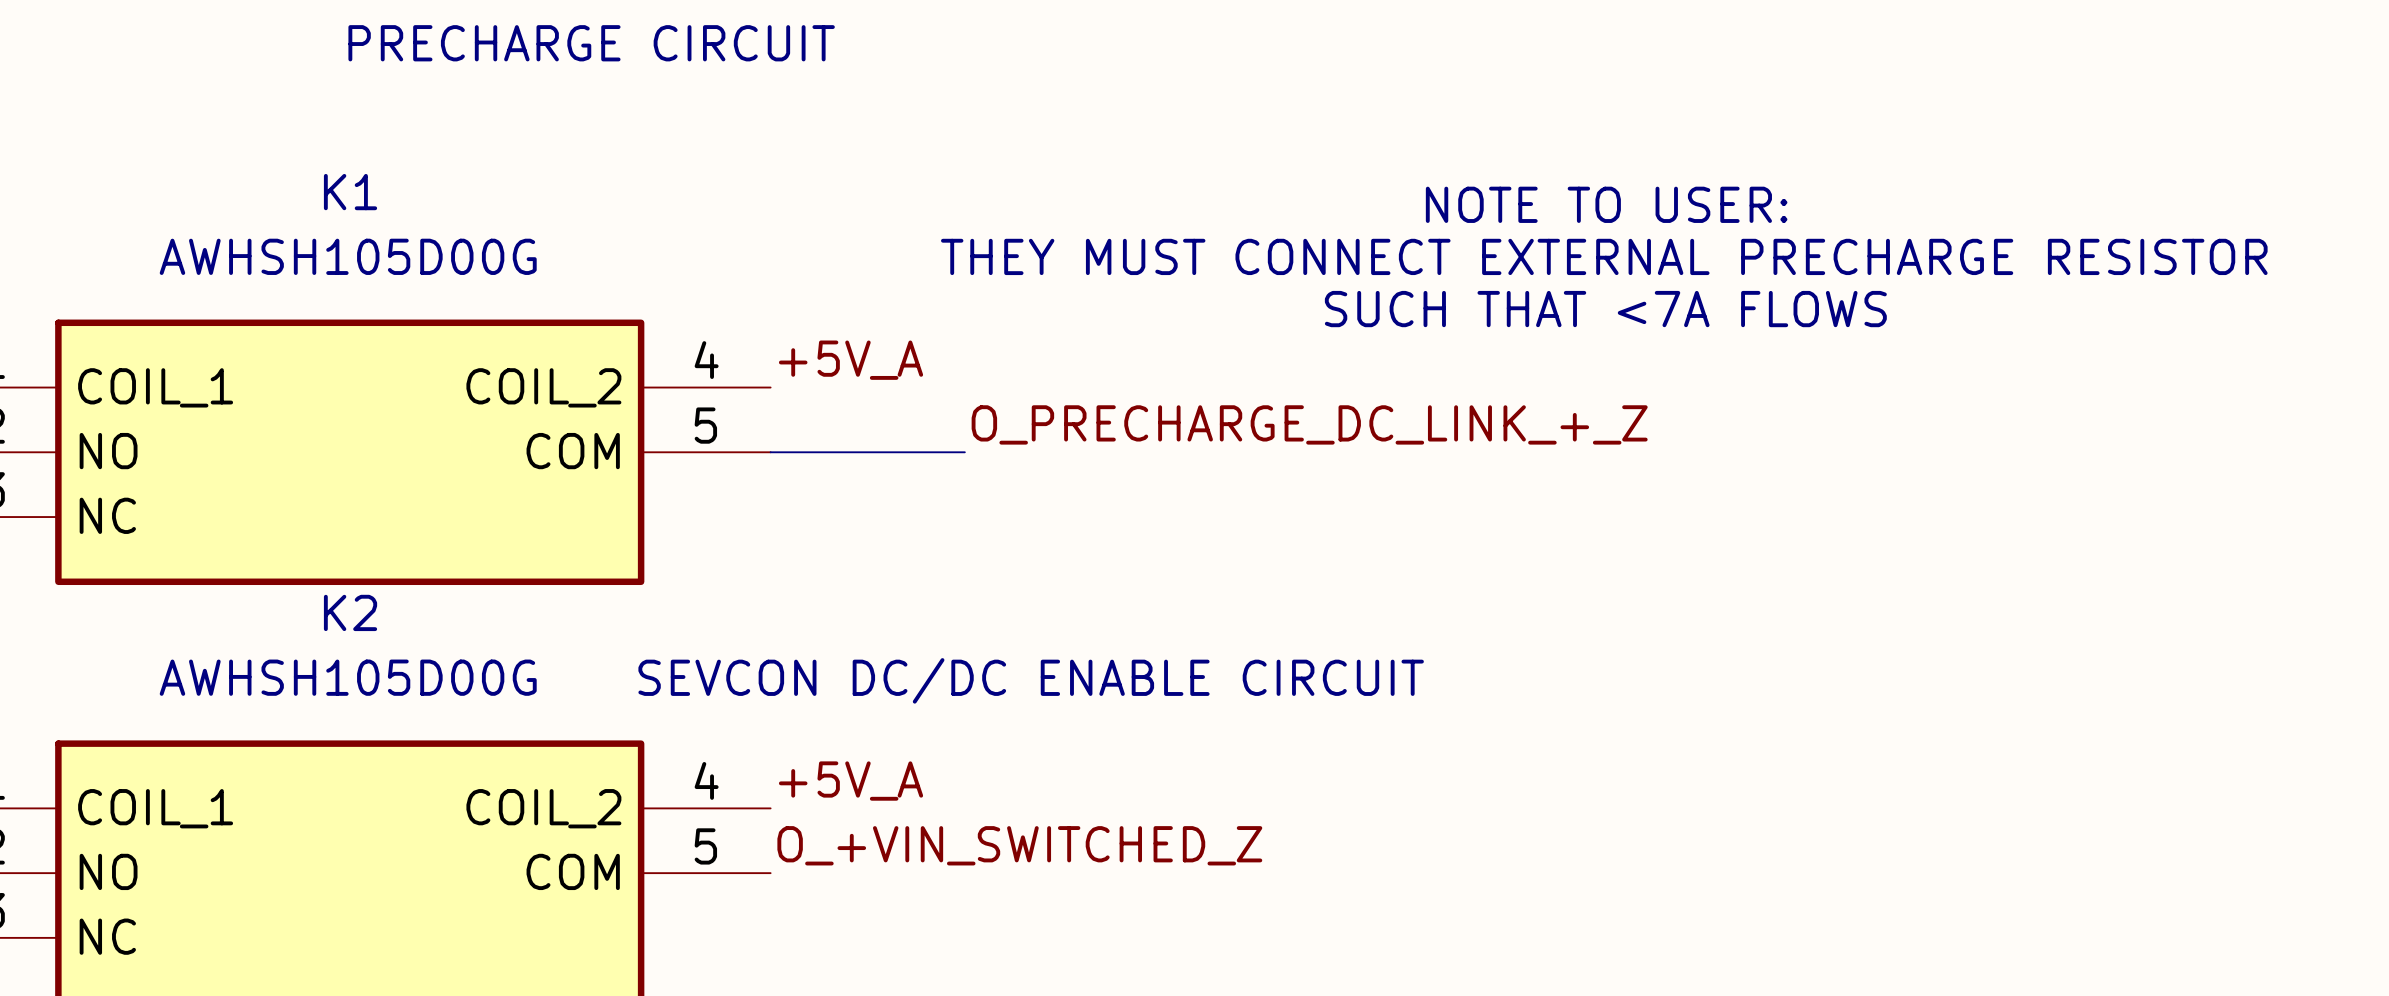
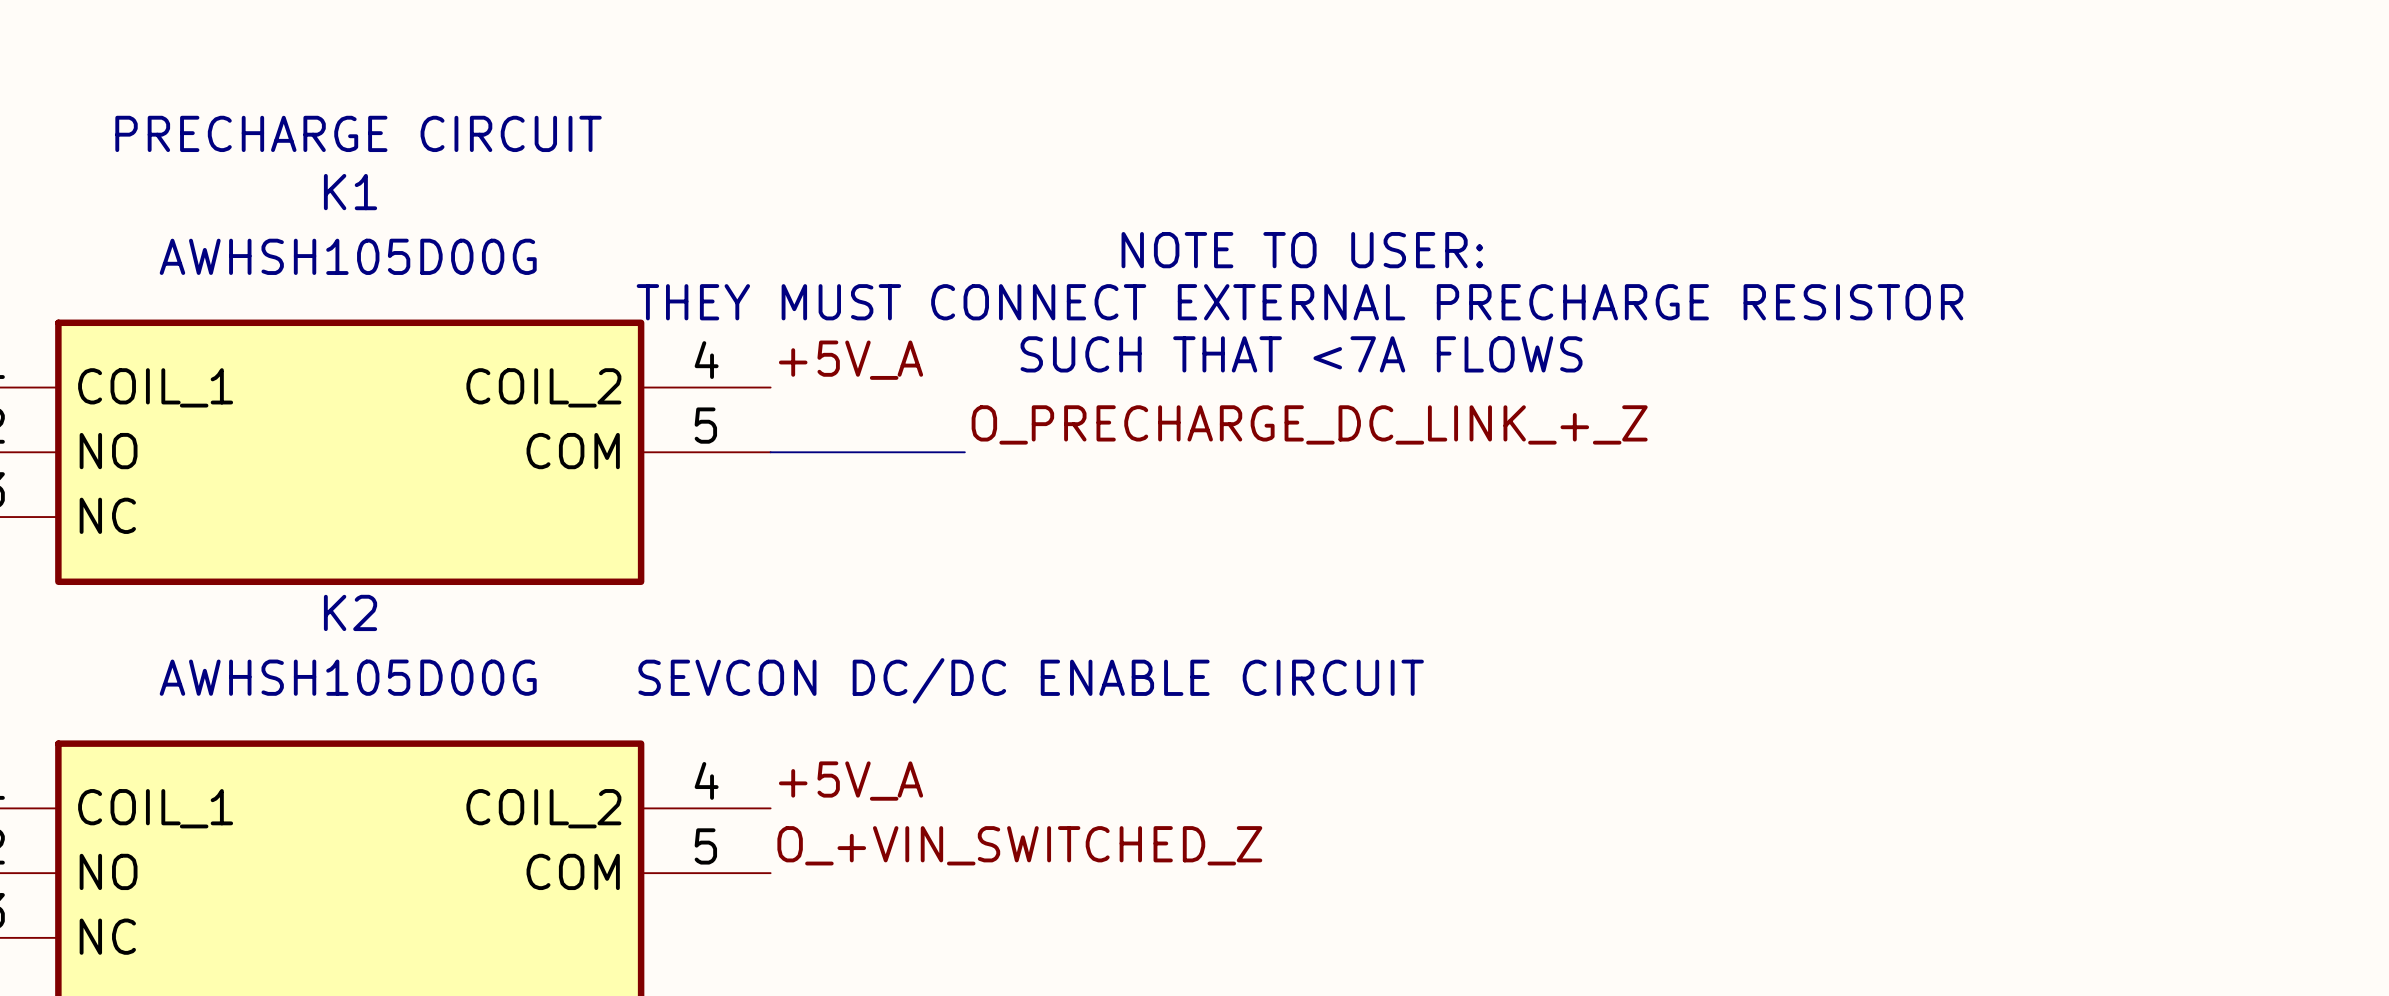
text position: PRECHARGE CIRCUIT (591, 43) -> PRECHARGE CIRCUIT (358, 133)
text position: NOTE TO USER: (1606, 204) -> NOTE TO USER: (1302, 250)
text position: THEY MUST CONNECT EXTERNAL PRECHARGE RESISTOR (1604, 256) -> THEY MUST CONNECT EXTERNAL PRECHARGE RESISTOR (1299, 302)
text position: SUCH THAT <7A FLOWS (1605, 309) -> SUCH THAT <7A FLOWS (1301, 354)

